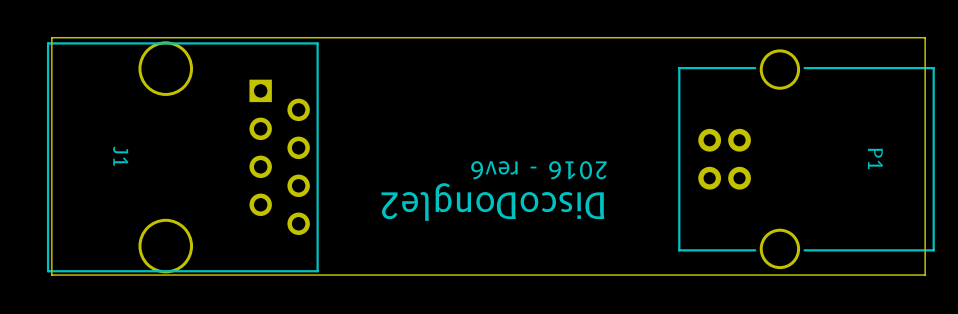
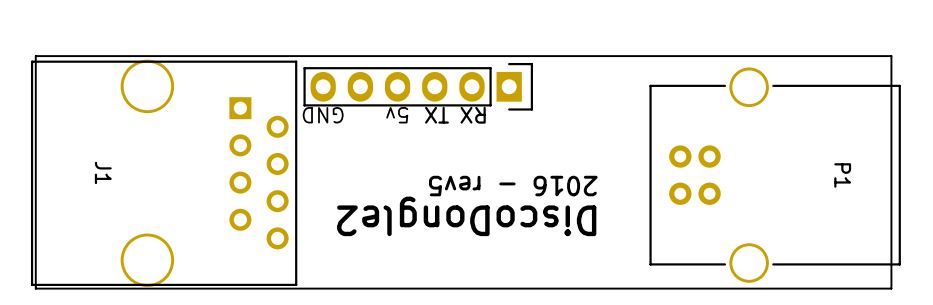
part: none -> (418, 86)
text: none -> 5v (397, 115)
text: none -> GND (323, 115)
text: none -> TX (436, 115)
text: none -> RX (473, 115)
text: 2016 - rev6 (538, 170) -> 2016 - rev5 (513, 186)

